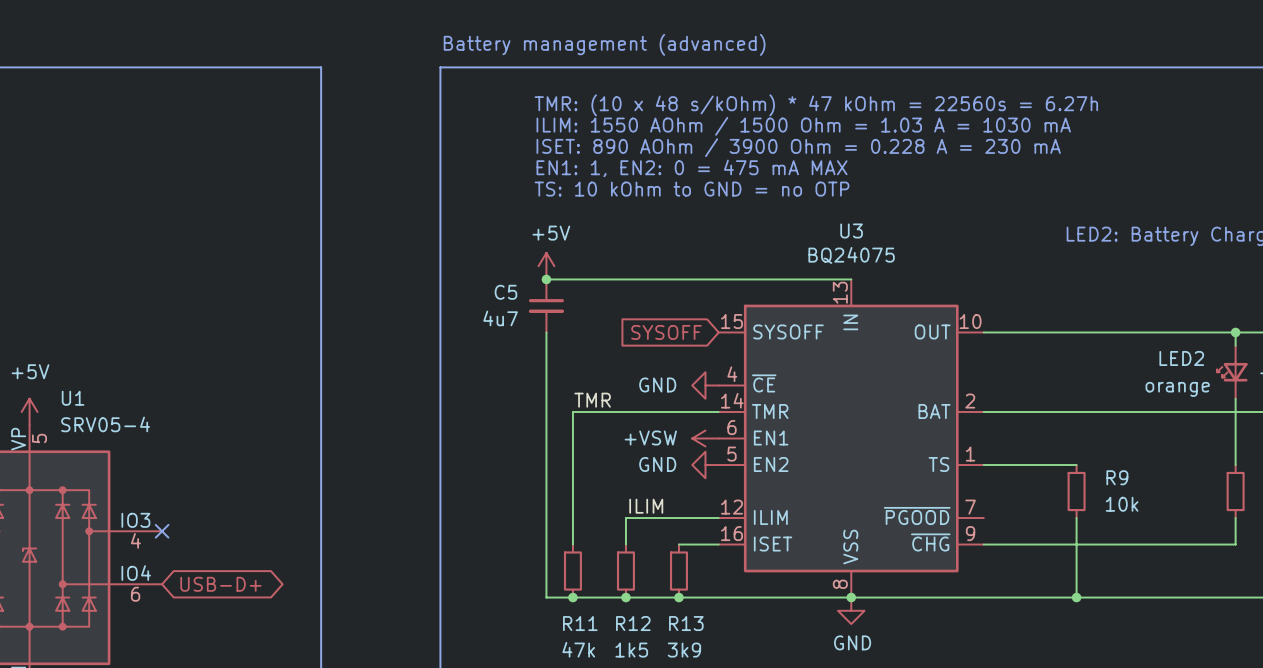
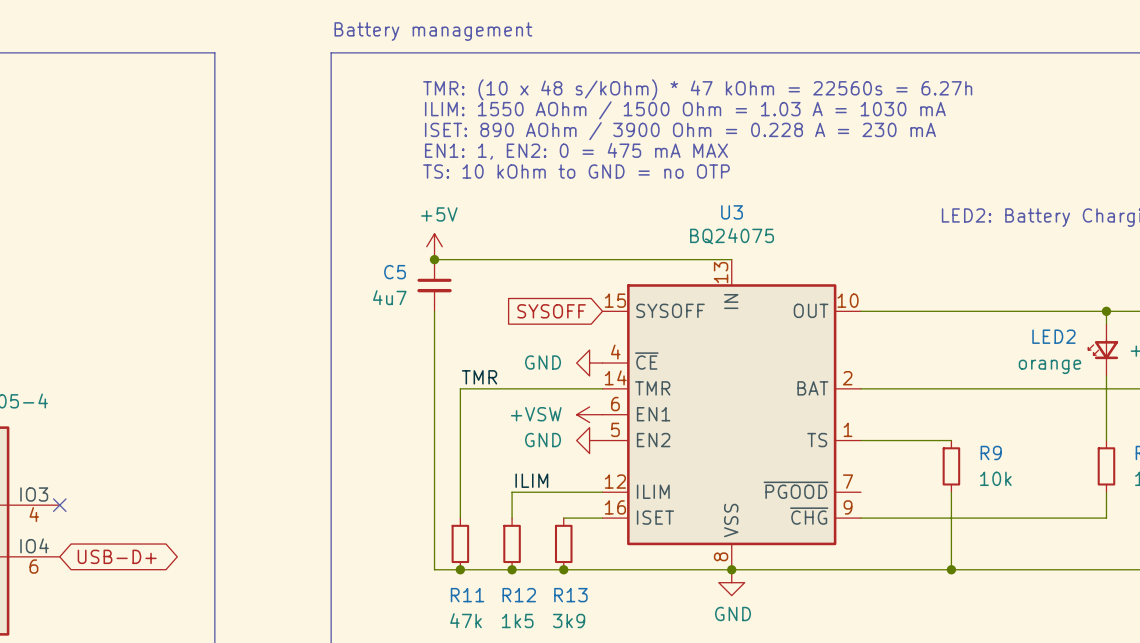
text: Battery management (advanced) (604, 44) -> Battery management (433, 31)

